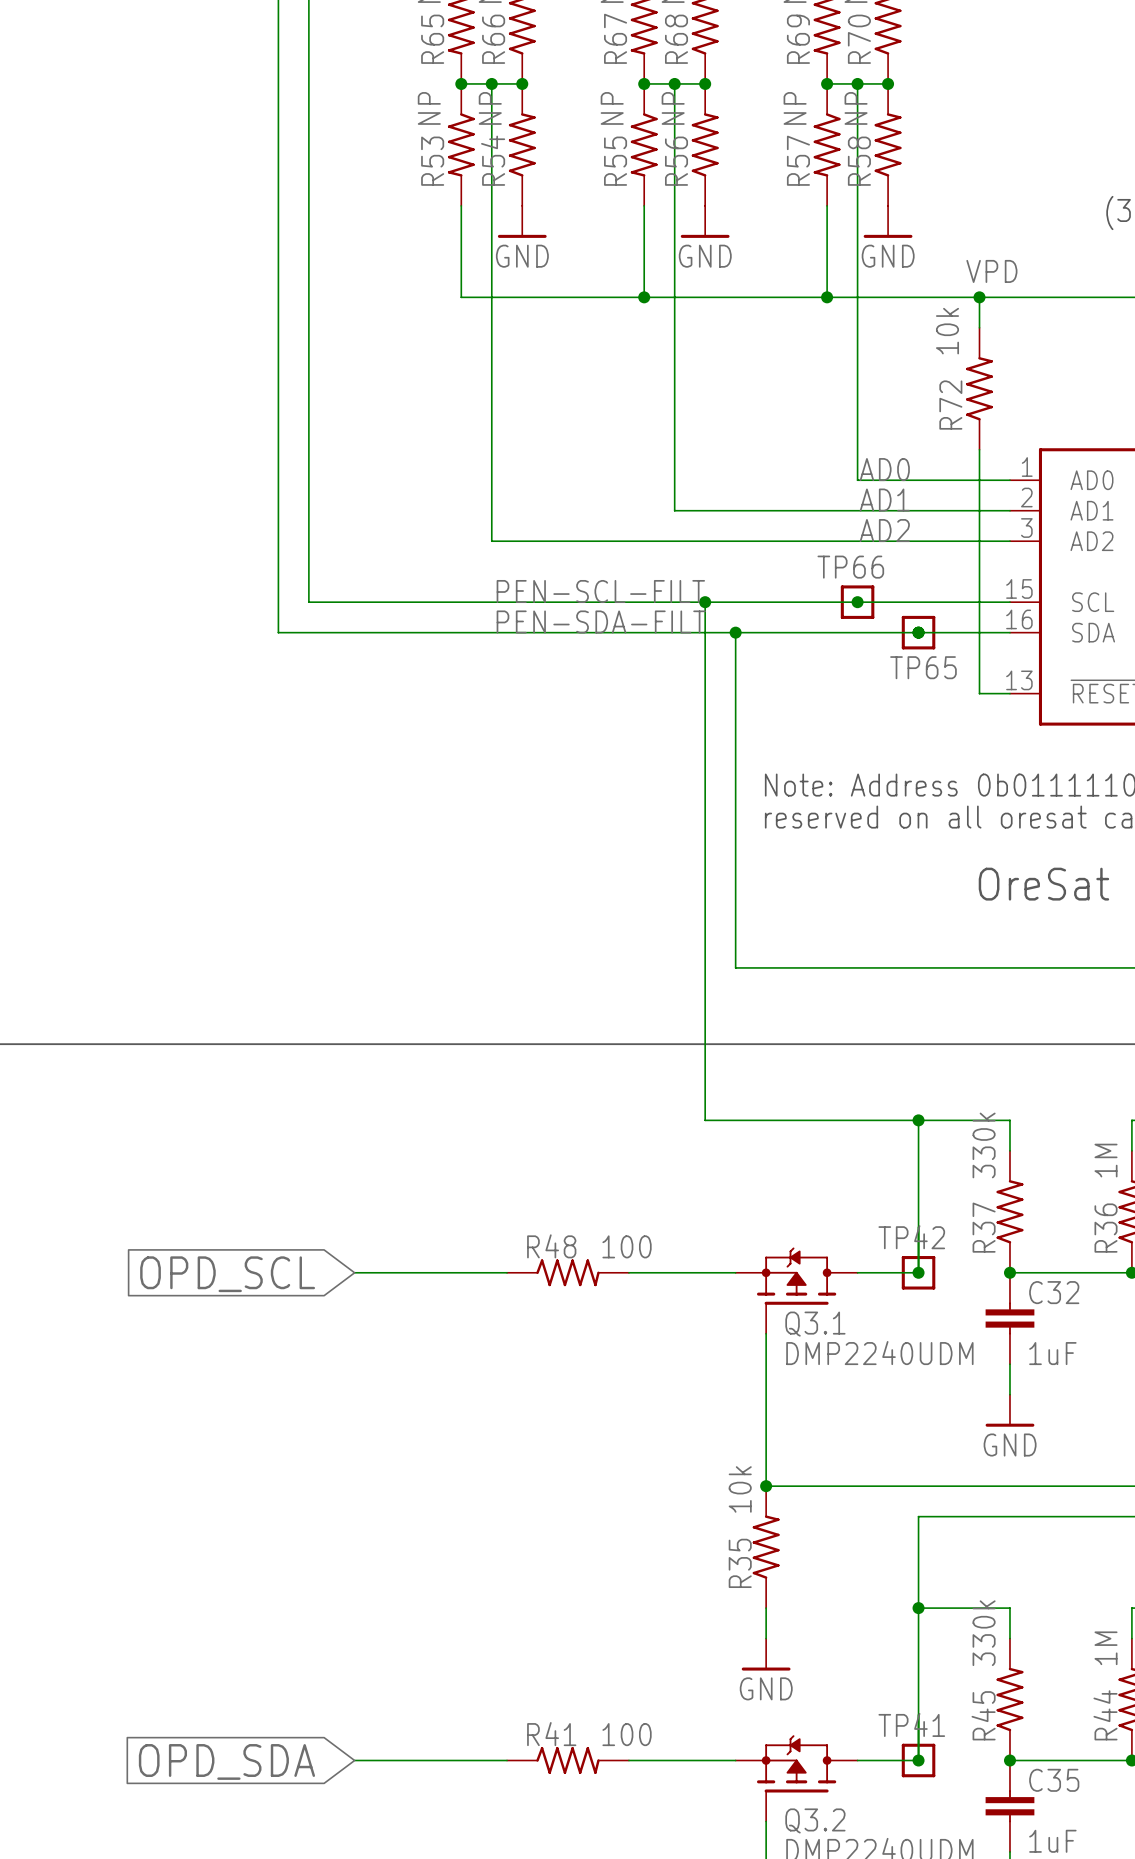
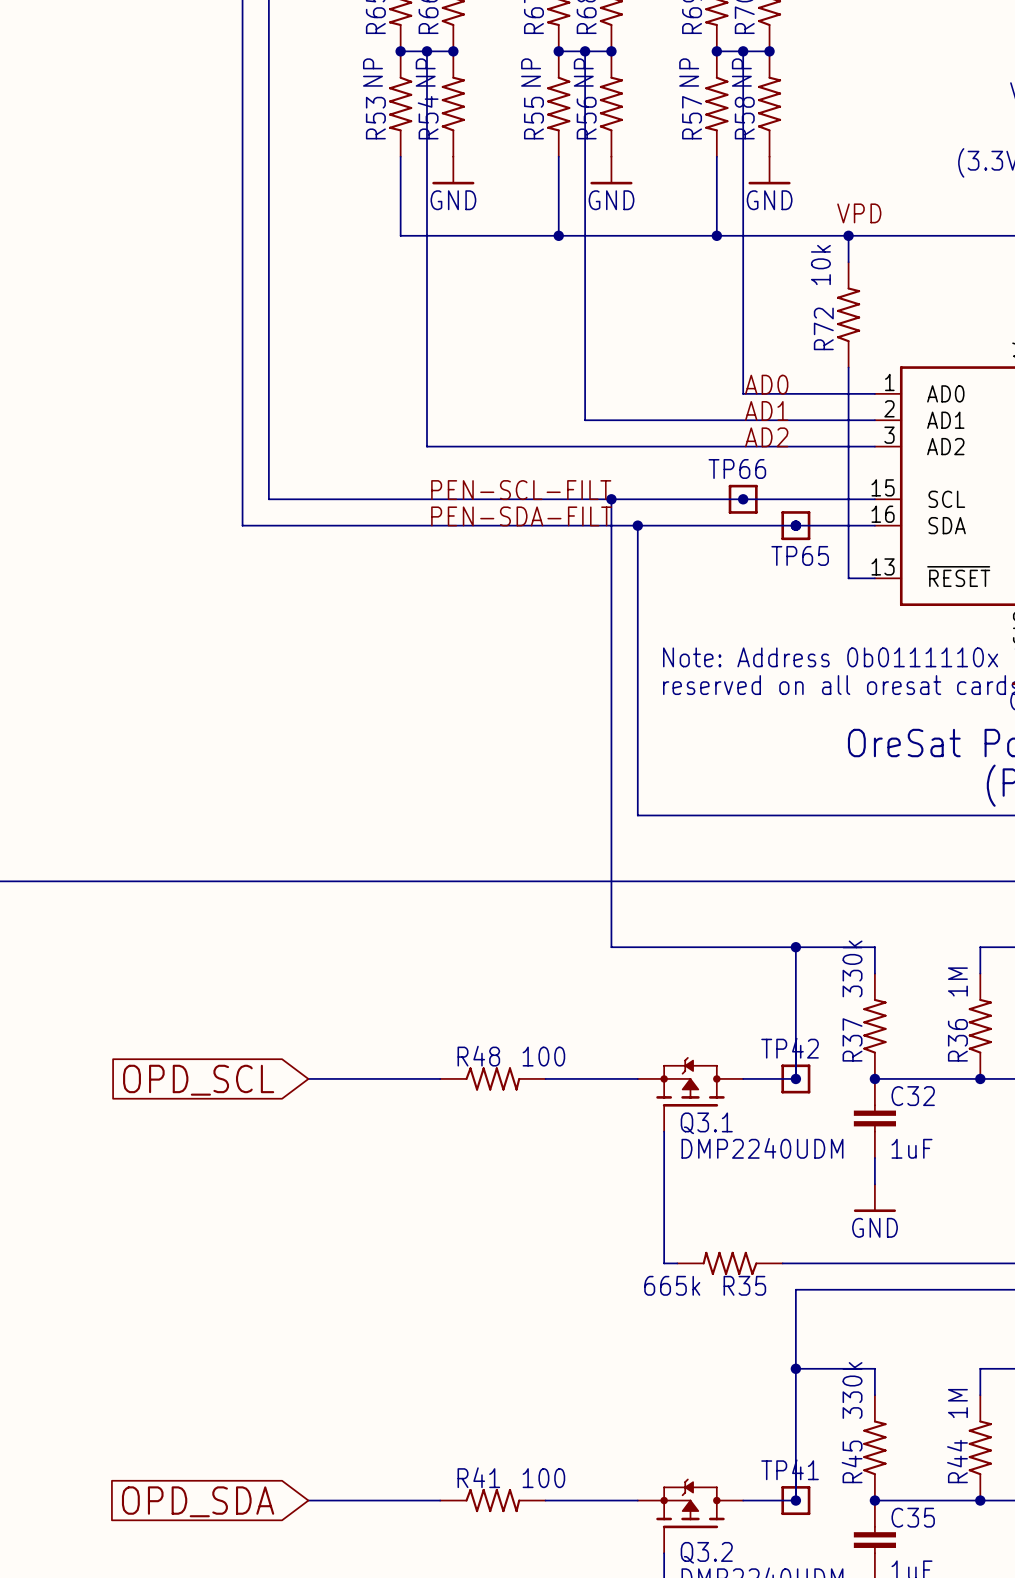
junction: (766, 1486) -> none
R35 value: 10k (740, 1489) -> 665k (672, 1285)
R35 rotation: 0° (766, 1547) -> 90° counterclockwise (730, 1263)
R35 position: (766, 1547) -> (730, 1263)
wire: (766, 1608) (766, 1638) -> none
power symbol: GND (766, 1654) -> none

